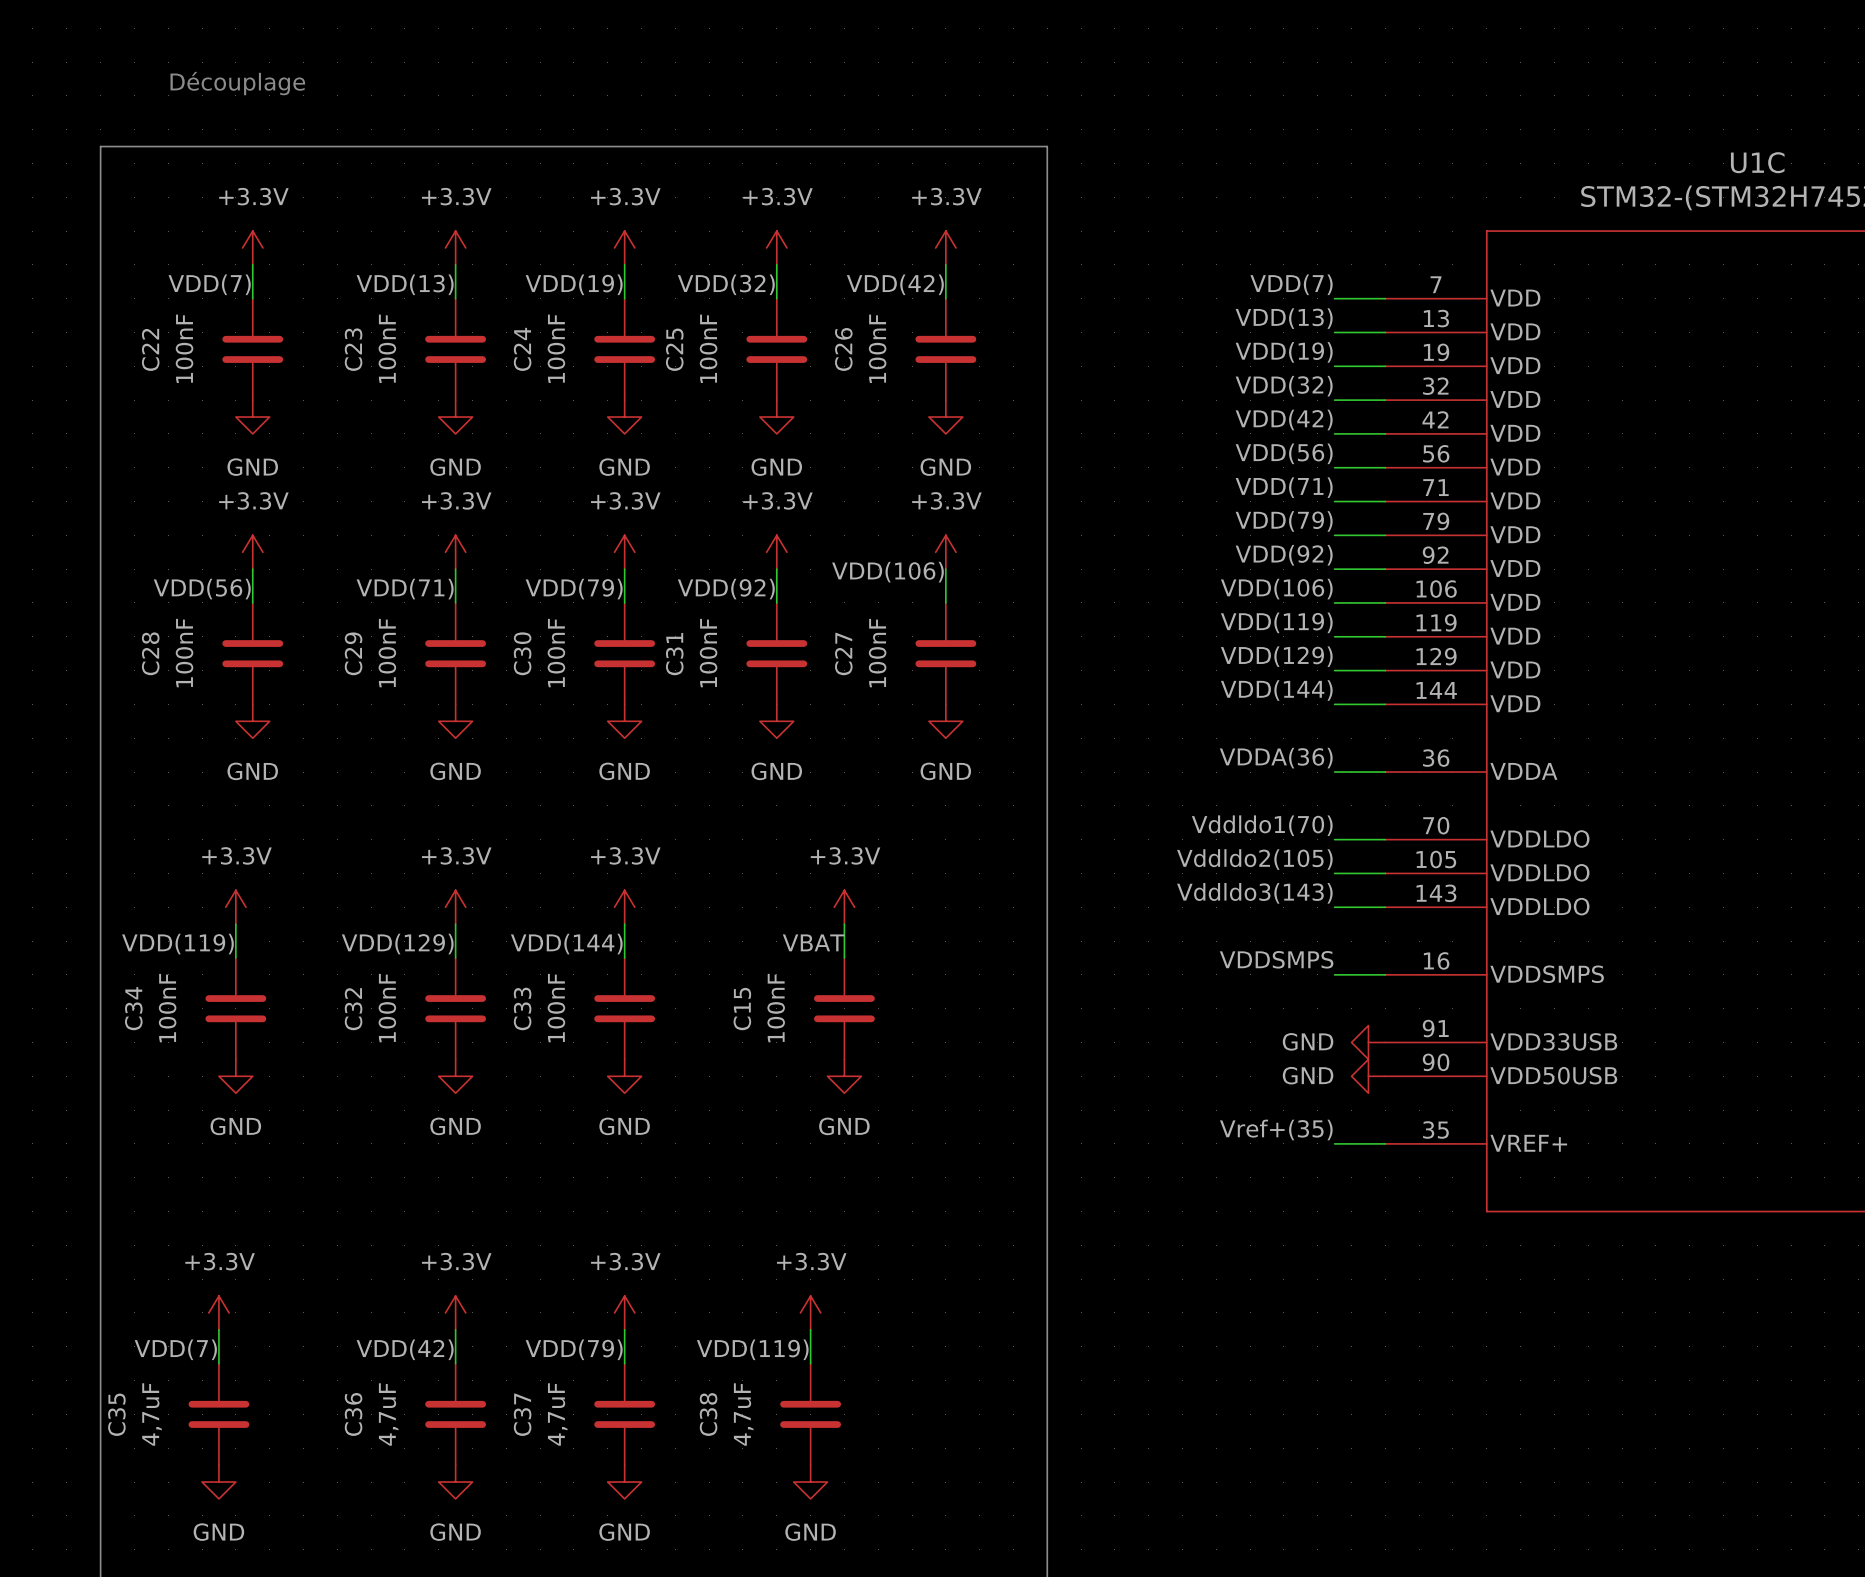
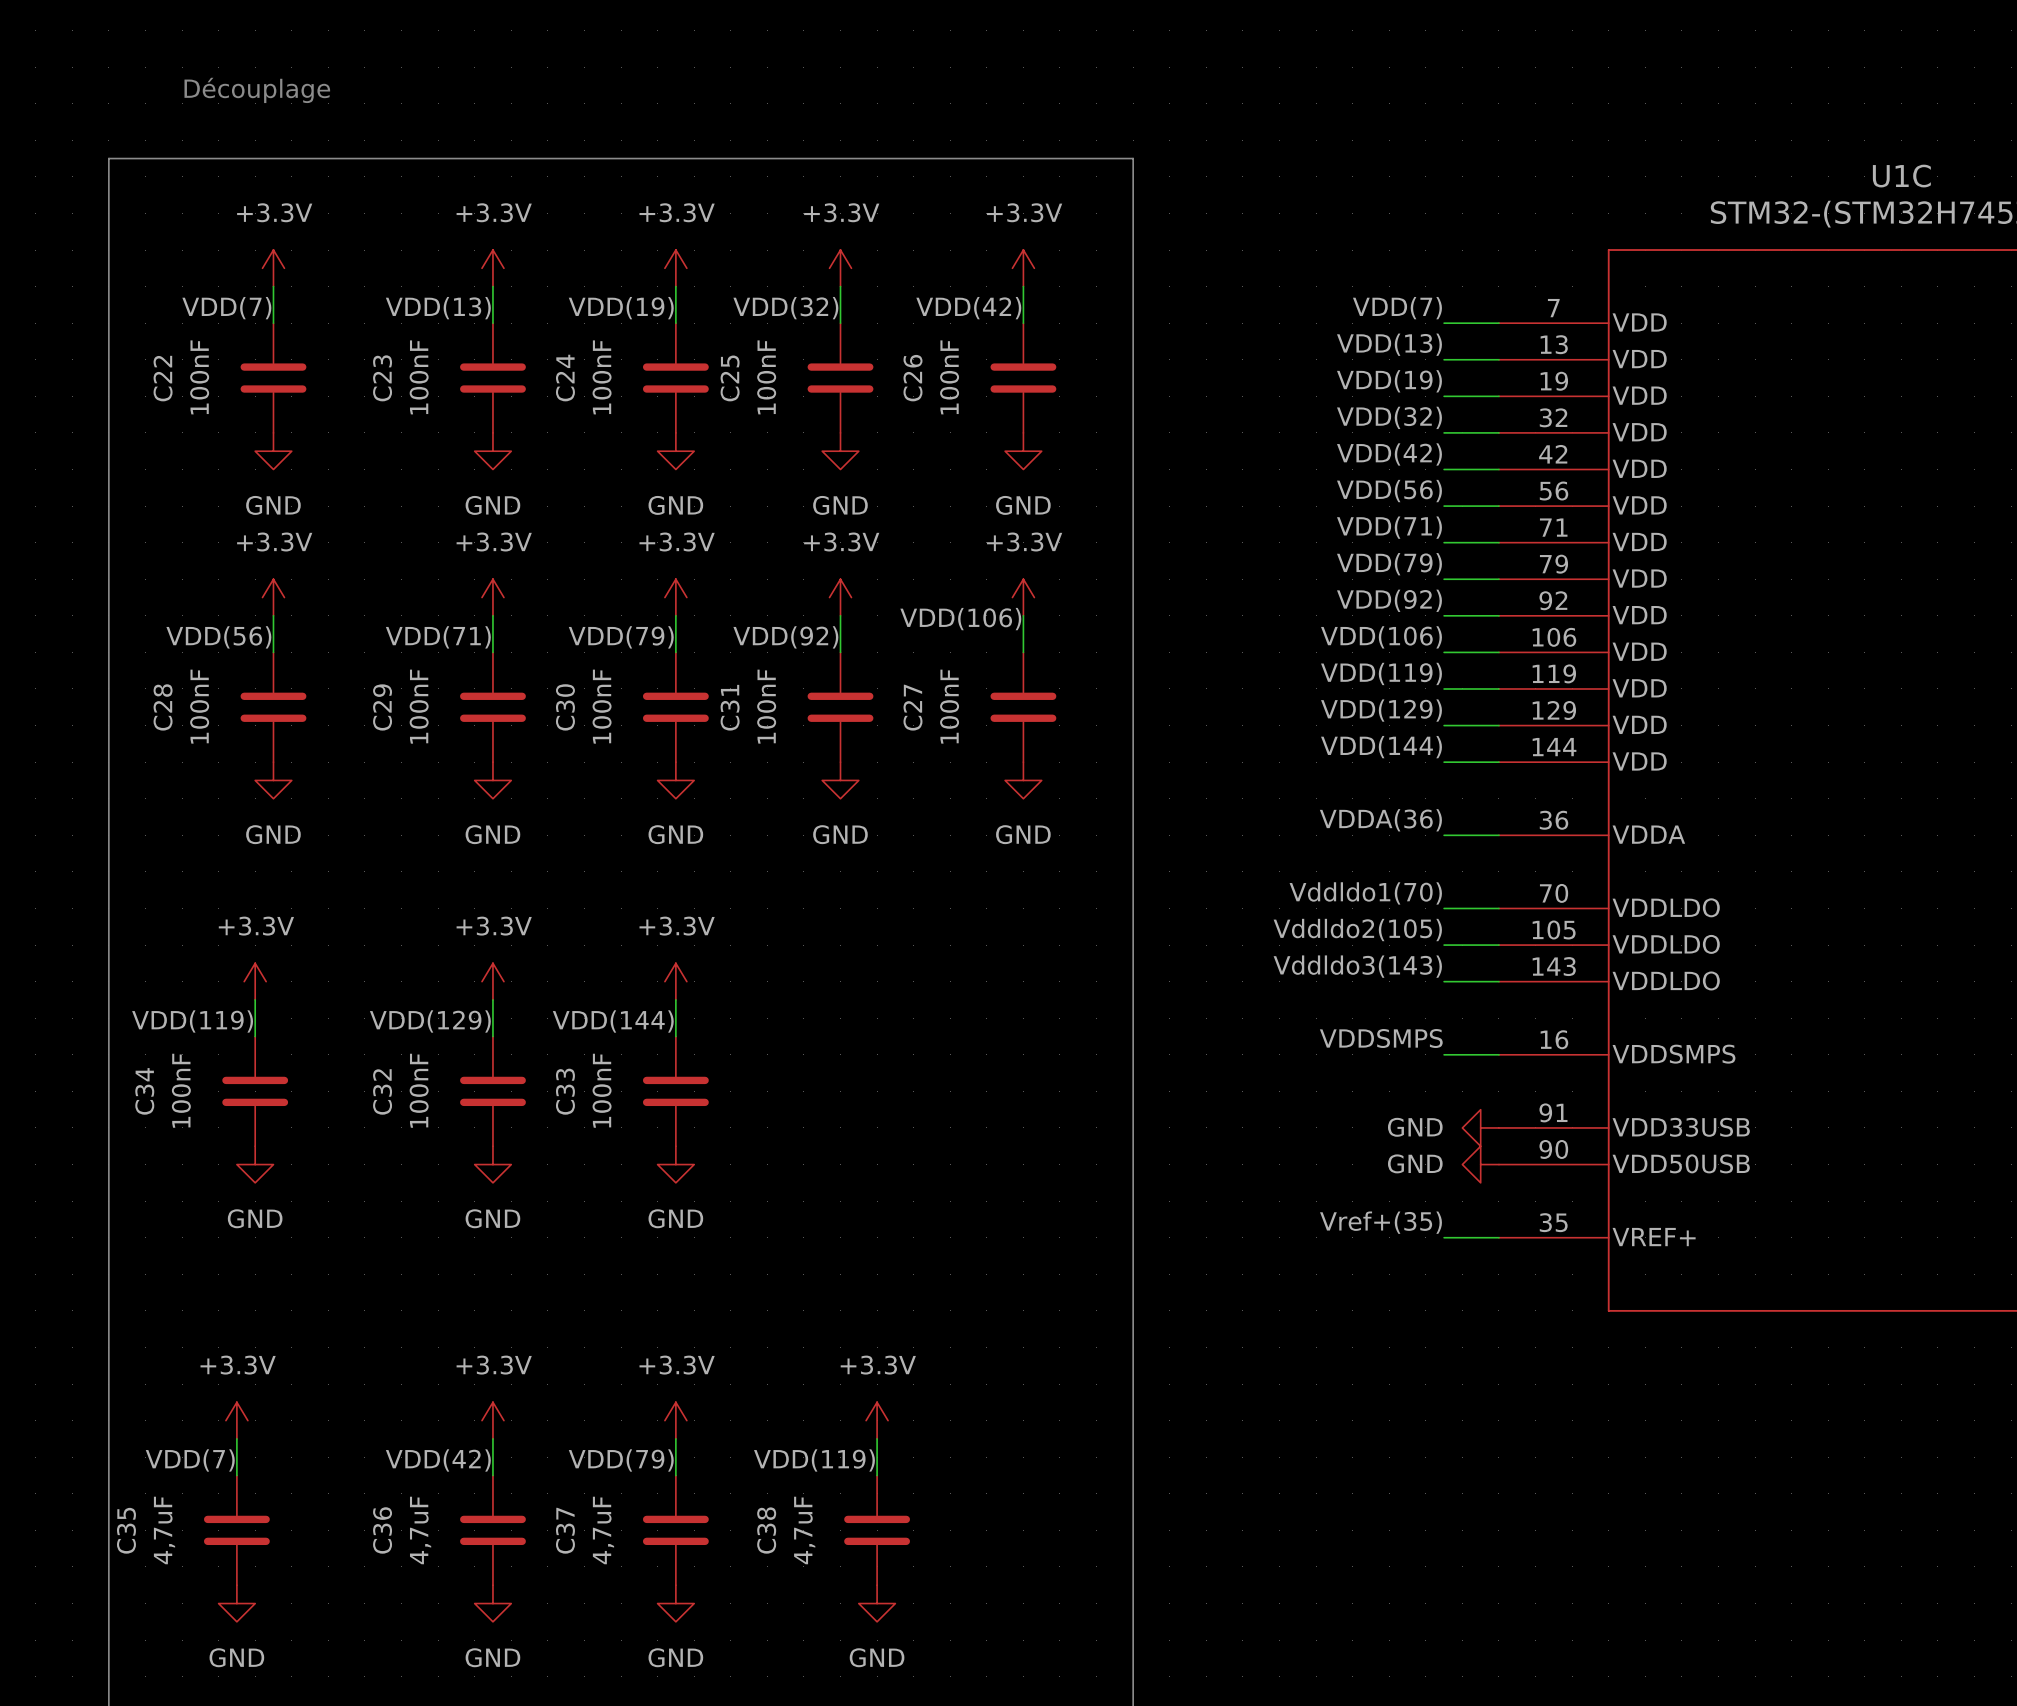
power symbol: +3.3V (844, 907) -> none
wire: (844, 924) (844, 957) -> none
label: VBAT (813, 942) -> none
C15: 100nF (844, 1008) -> none
power symbol: GND (844, 1076) -> none

